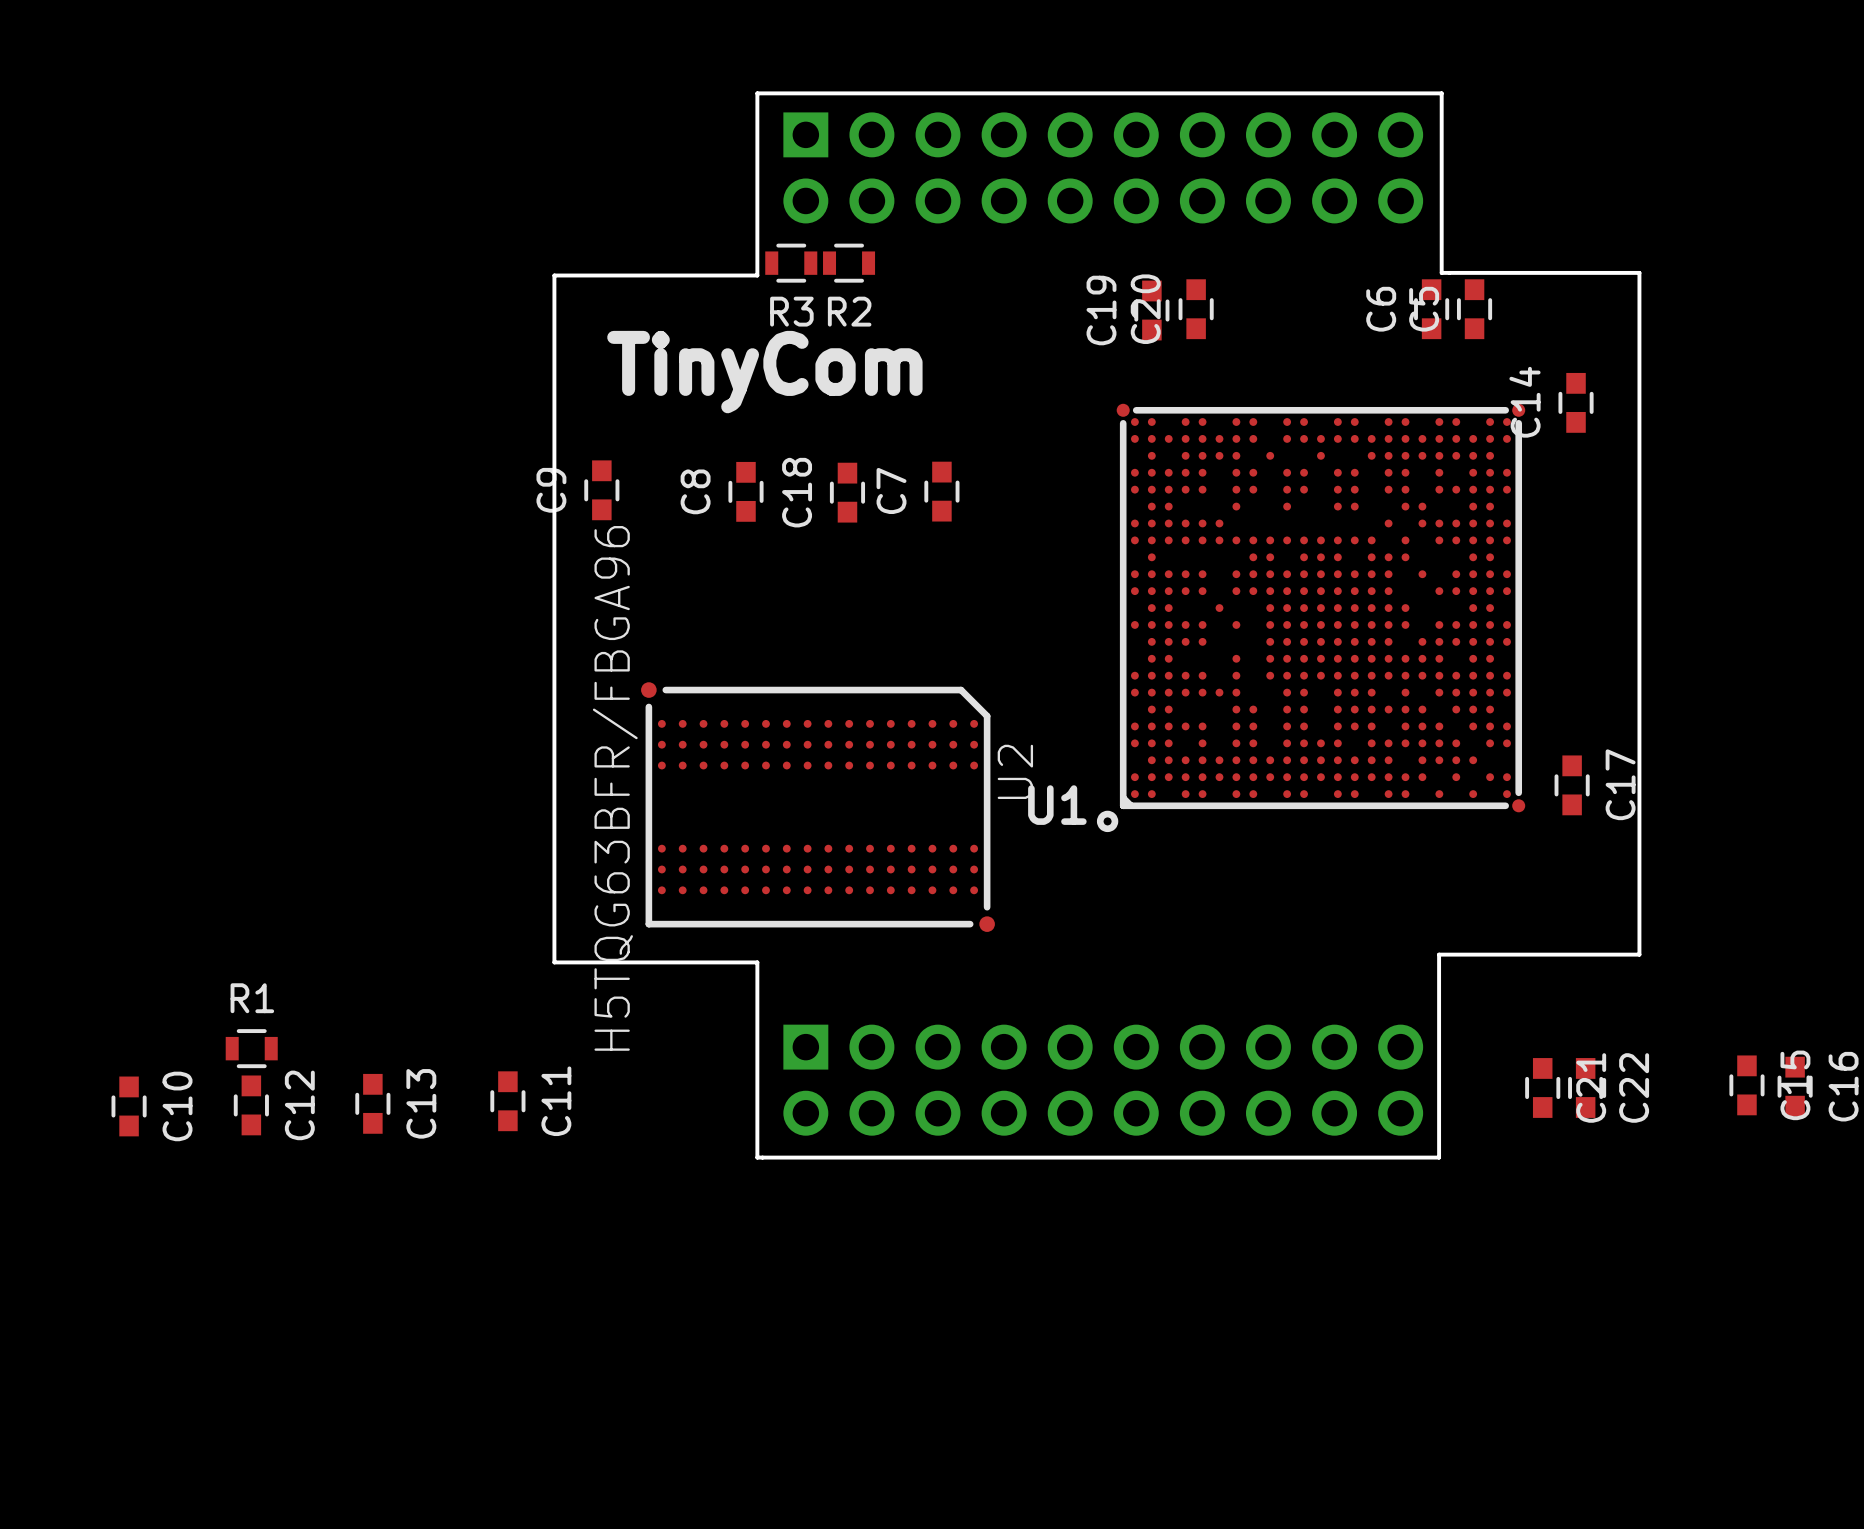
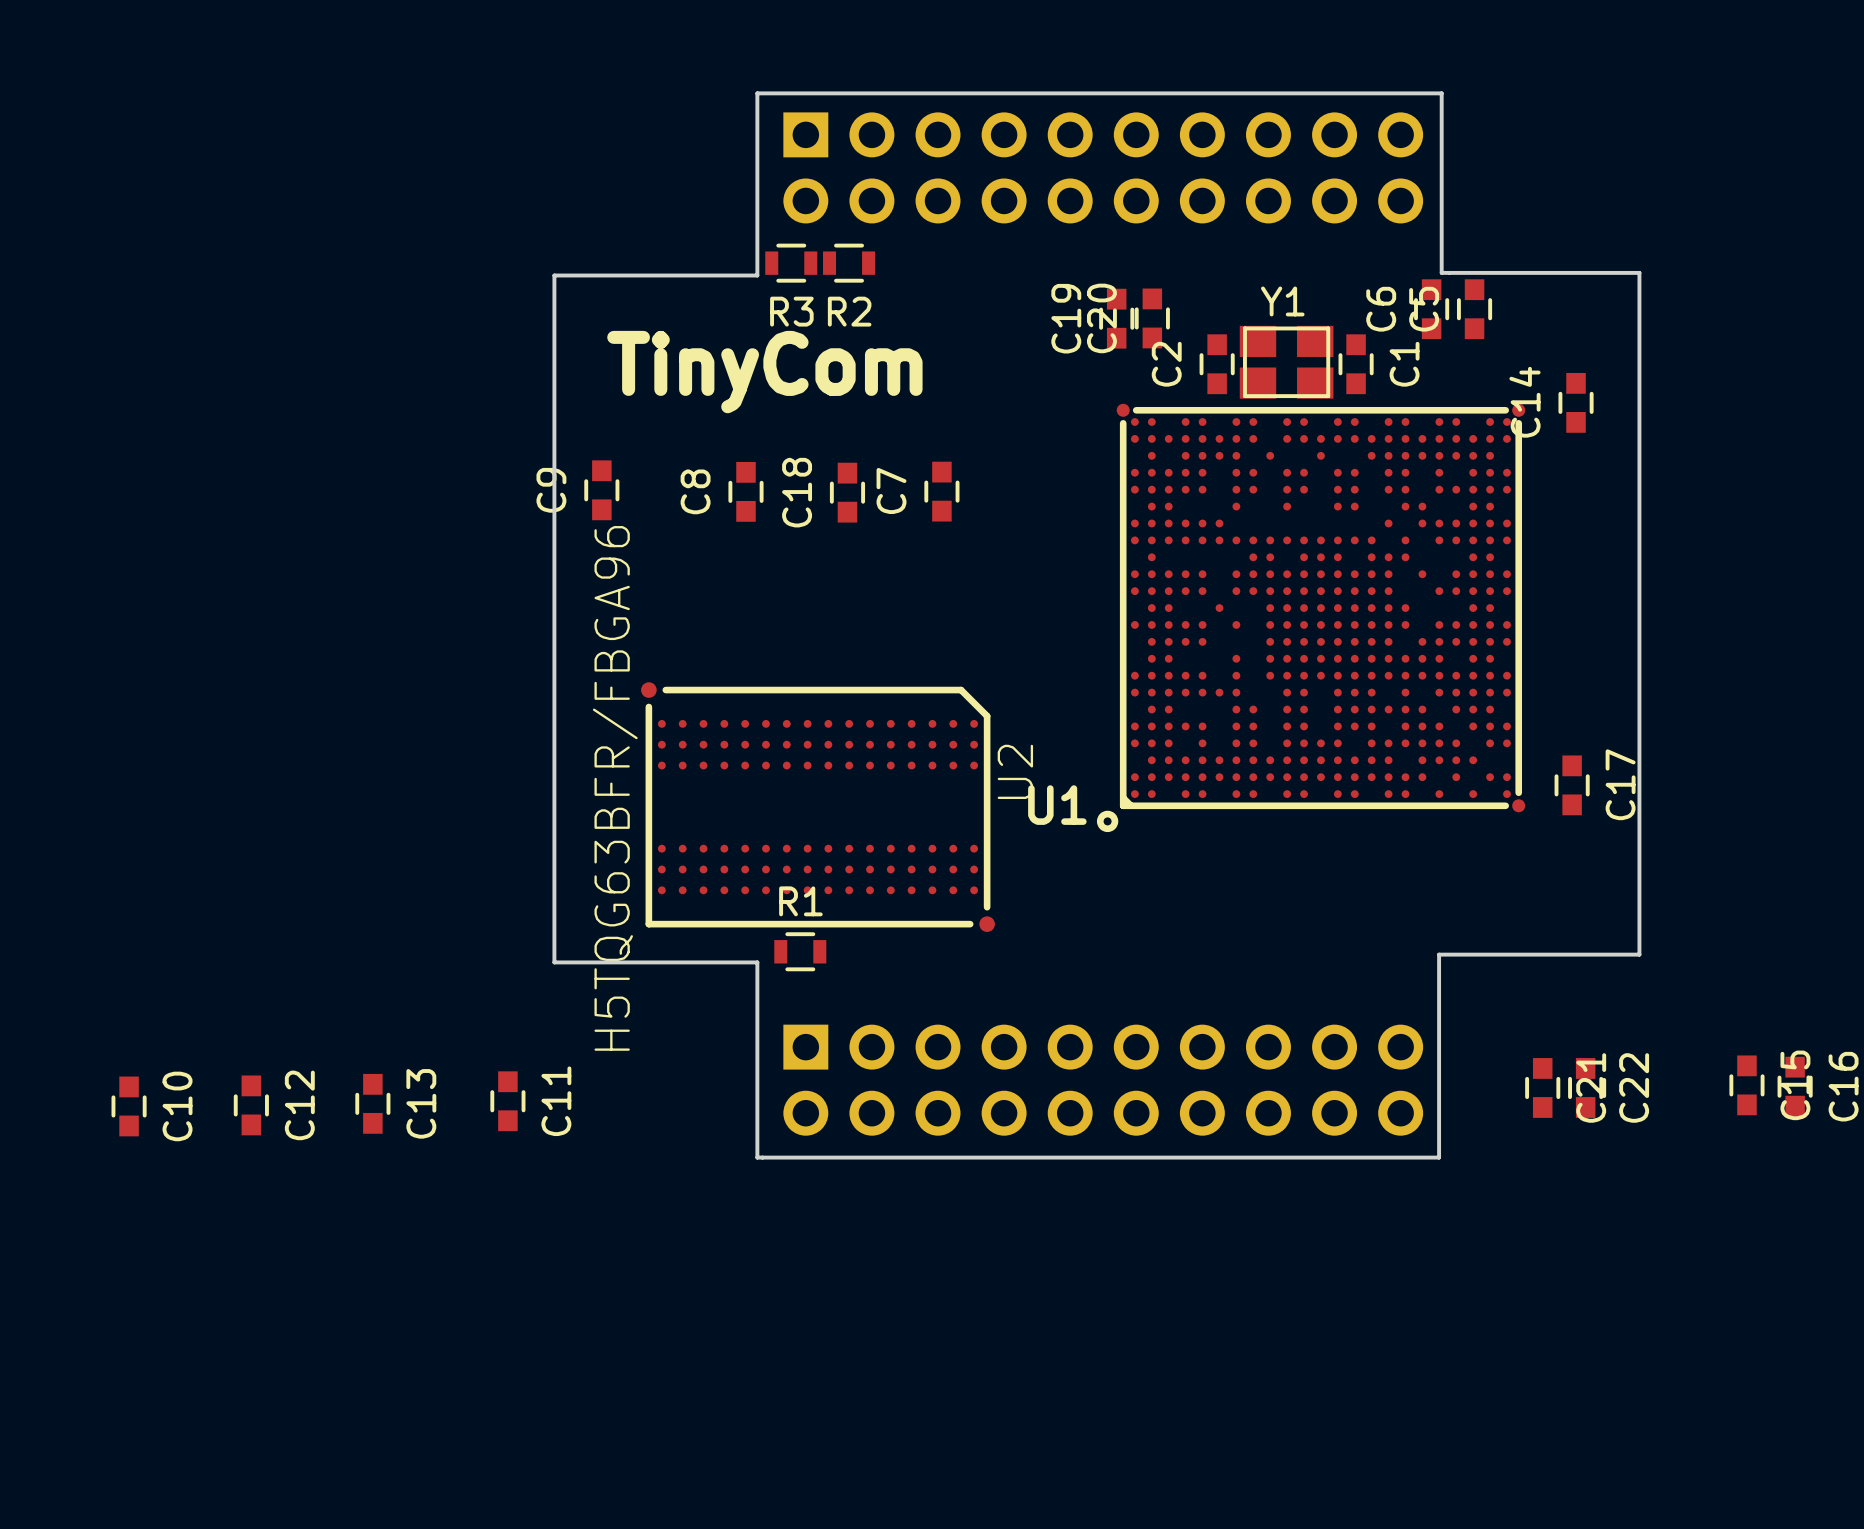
C20 position: (1196, 309) -> (1152, 318)
C19 position: (1151, 310) -> (1116, 318)
Y1: none -> (1286, 362)
C2: none -> (1217, 364)
C1: none -> (1356, 364)
R1 position: (251, 1048) -> (800, 951)

